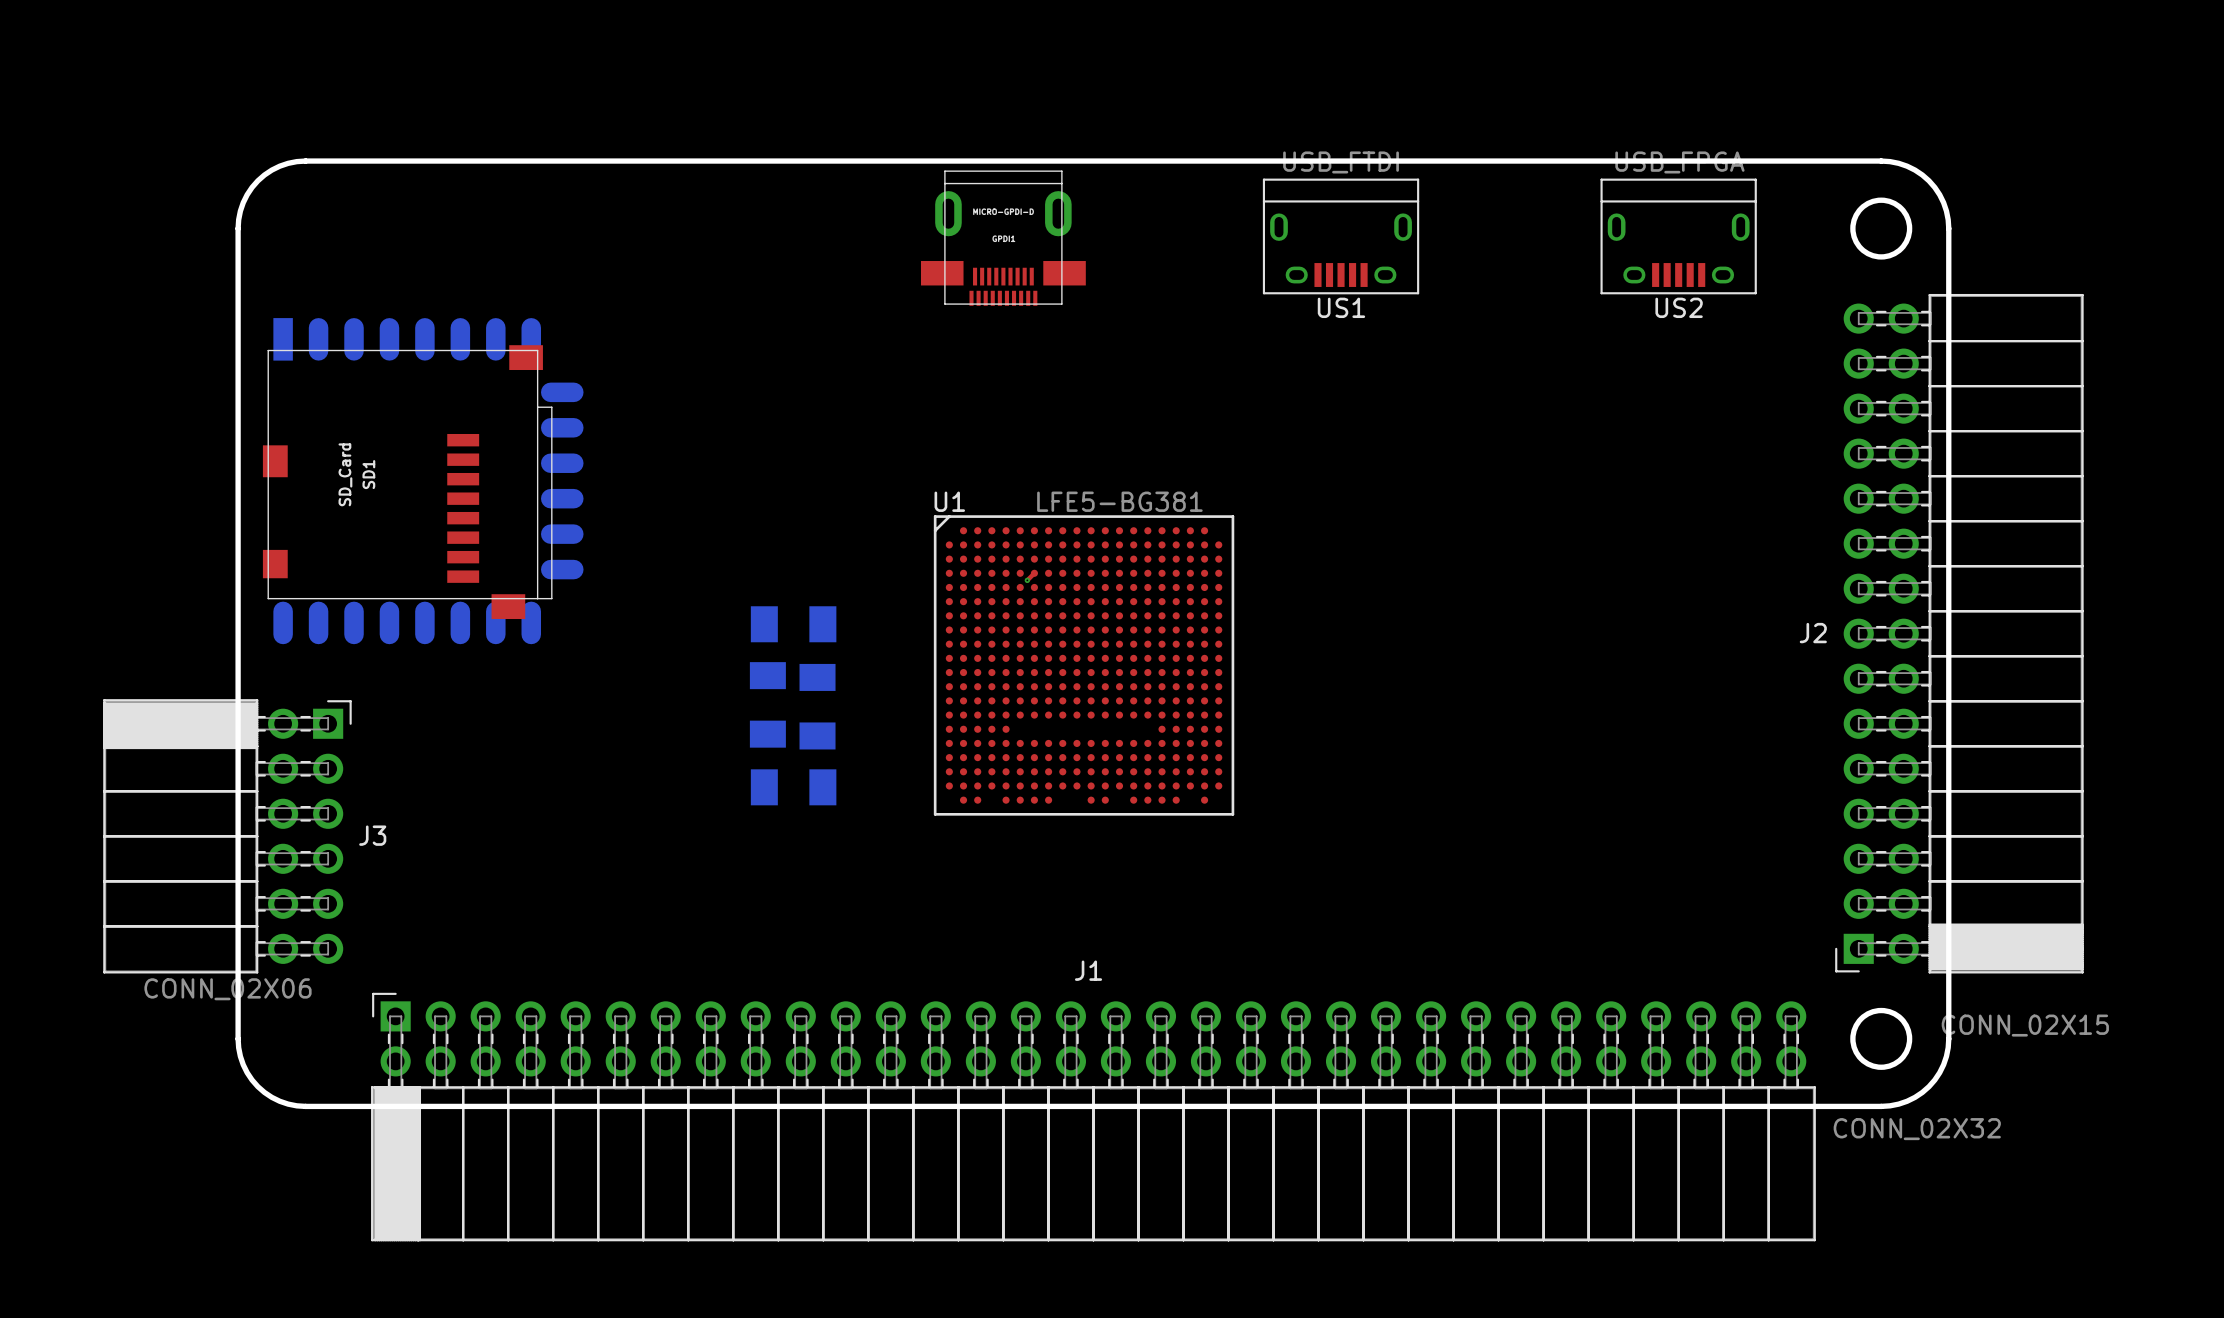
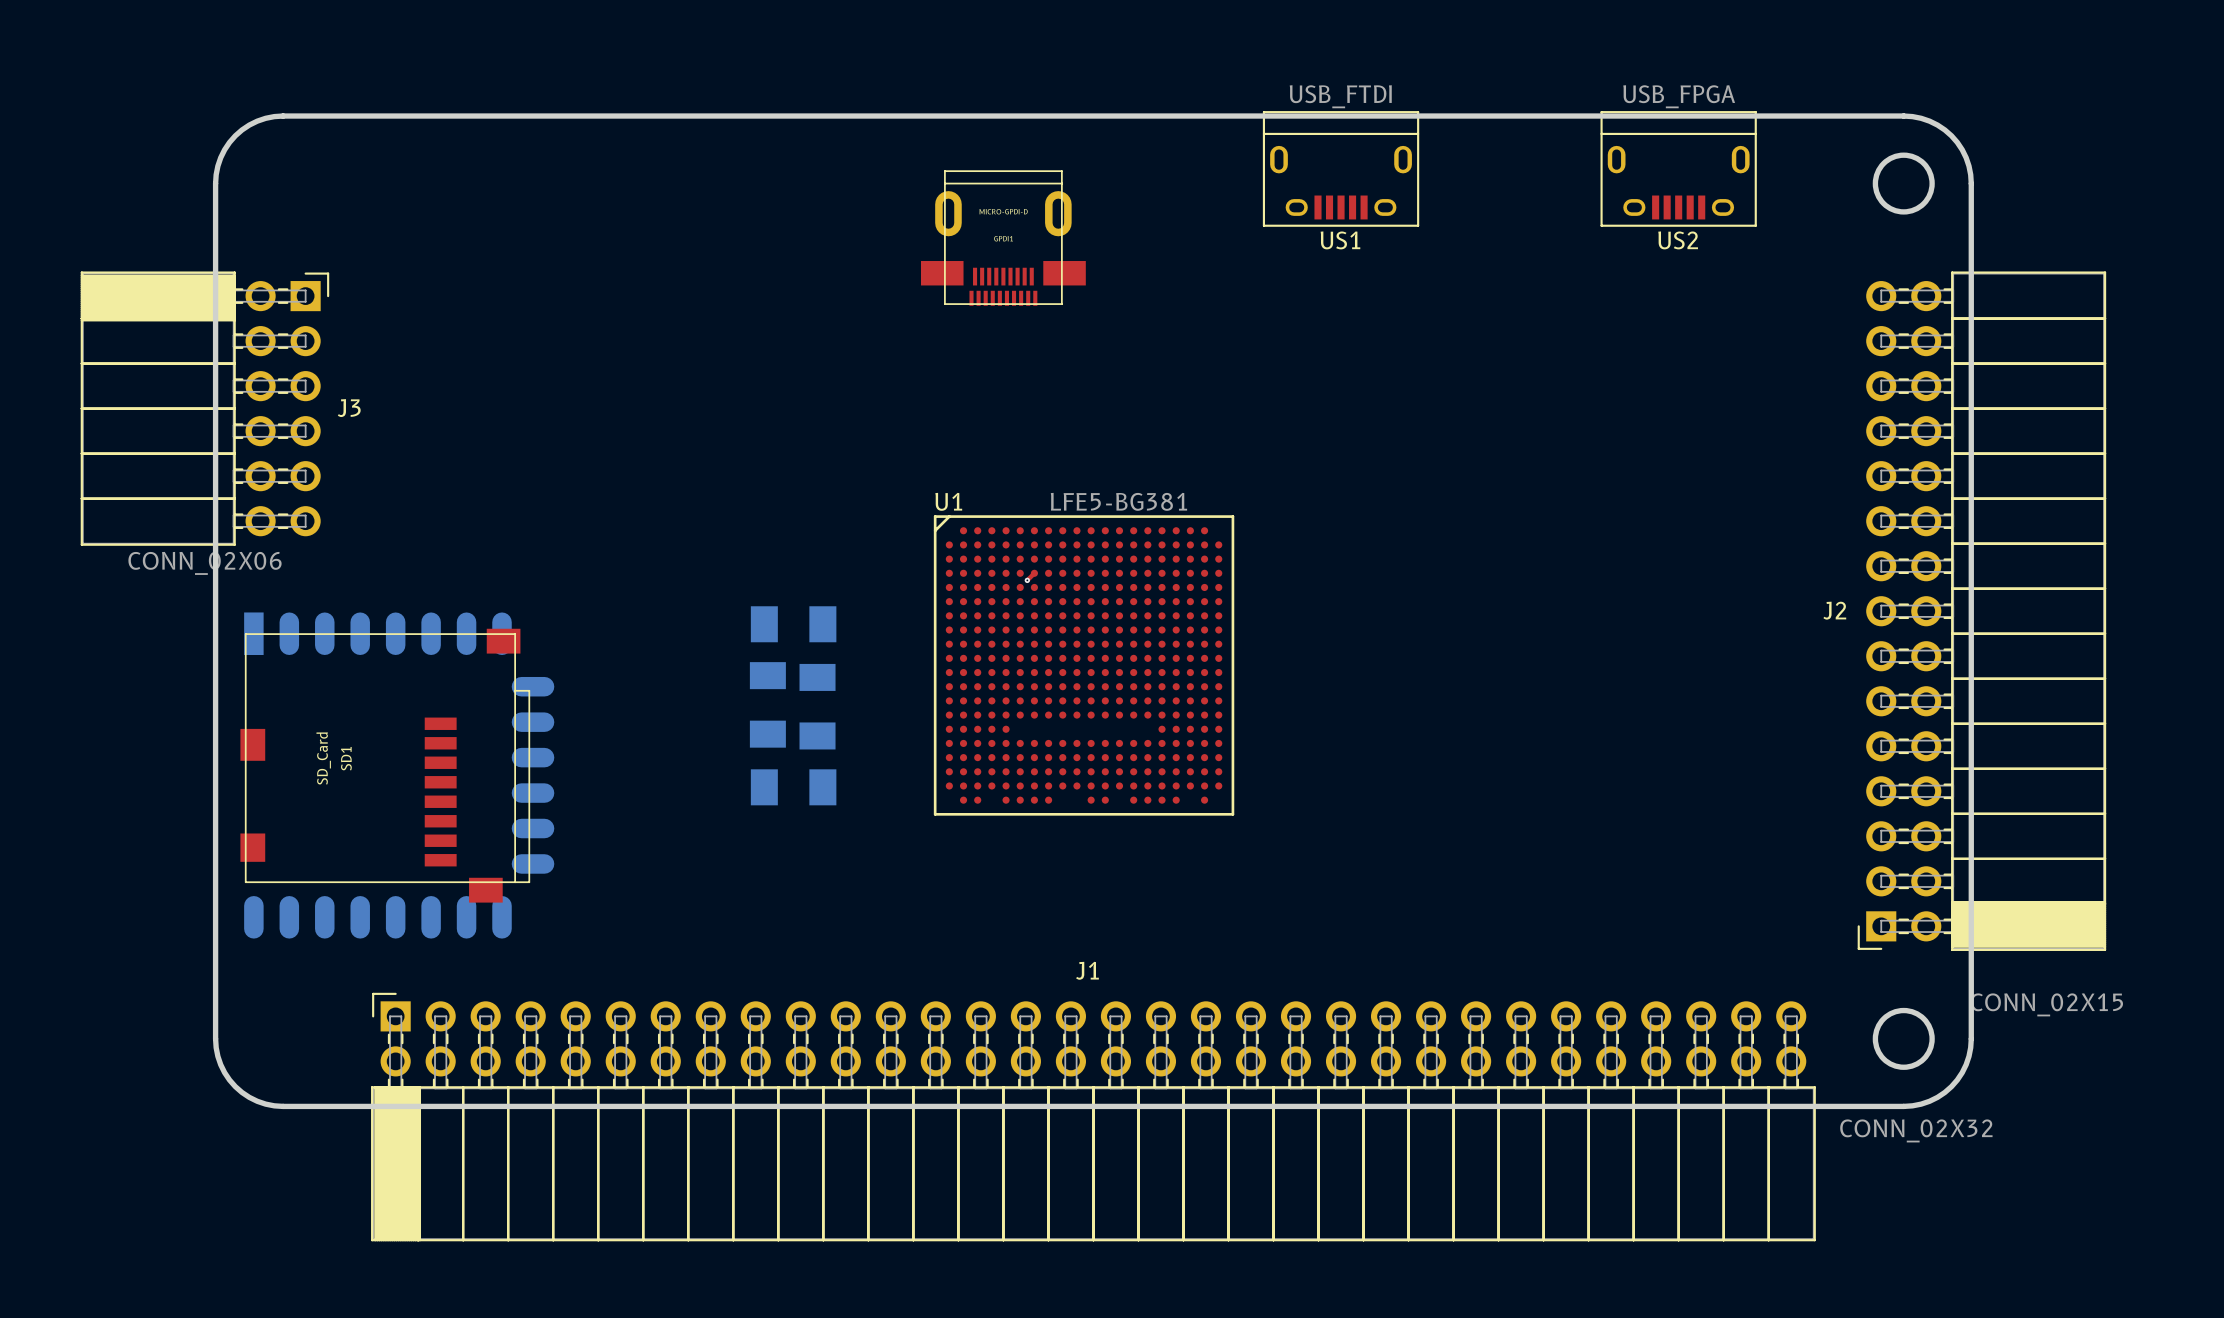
round board edge position: (1881, 228) -> (1903, 183)
US1 position: (1341, 236) -> (1341, 168)
US2 position: (1678, 236) -> (1678, 168)
part position: (428, 481) -> (399, 775)
SD1 position: (407, 482) -> (384, 765)
J2 position: (1959, 633) -> (1981, 611)
J3 position: (227, 836) -> (204, 408)
round board edge position: (1881, 1038) -> (1903, 1038)
board edge: (305, 1106) (279, 1101) (257, 1086) (243, 1064) (238, 1038) (238, 219) (247, 194) (264, 175) (288, 163) (305, 161) (1881, 161) (1898, 163) (1915, 170) (1929, 180) (1939, 194) (1946, 211) (1948, 228) (1948, 1038) (1943, 1064) (1929, 1086) (1907, 1101) (1881, 1106) -> (305, 1106) (265, 1104) (242, 1092) (229, 1080) (220, 1064) (215, 1038) (216, 174) (224, 149) (242, 129) (265, 118) (283, 116) (1903, 116) (1921, 118) (1937, 125) (1951, 135) (1962, 149) (1968, 166) (1971, 183) (1971, 1038) (1968, 1056) (1962, 1072) (1944, 1092) (1921, 1104) (1881, 1106)

